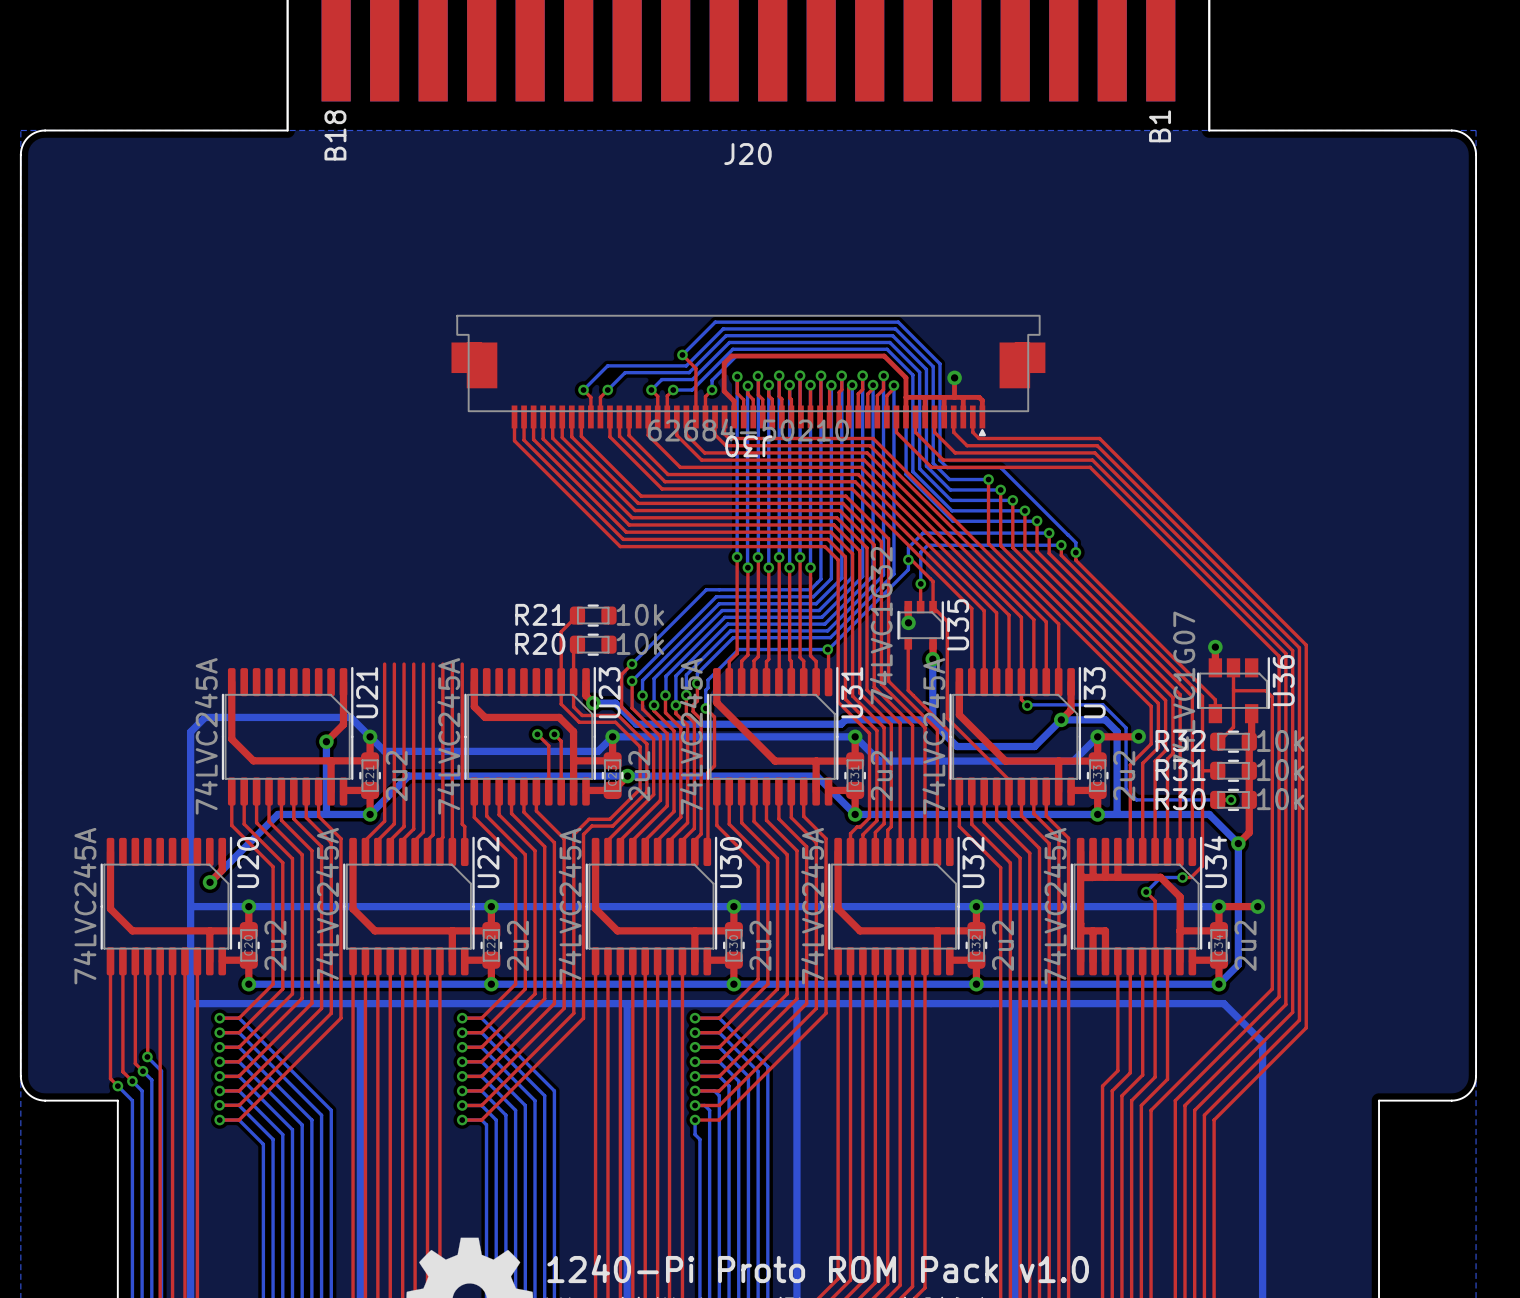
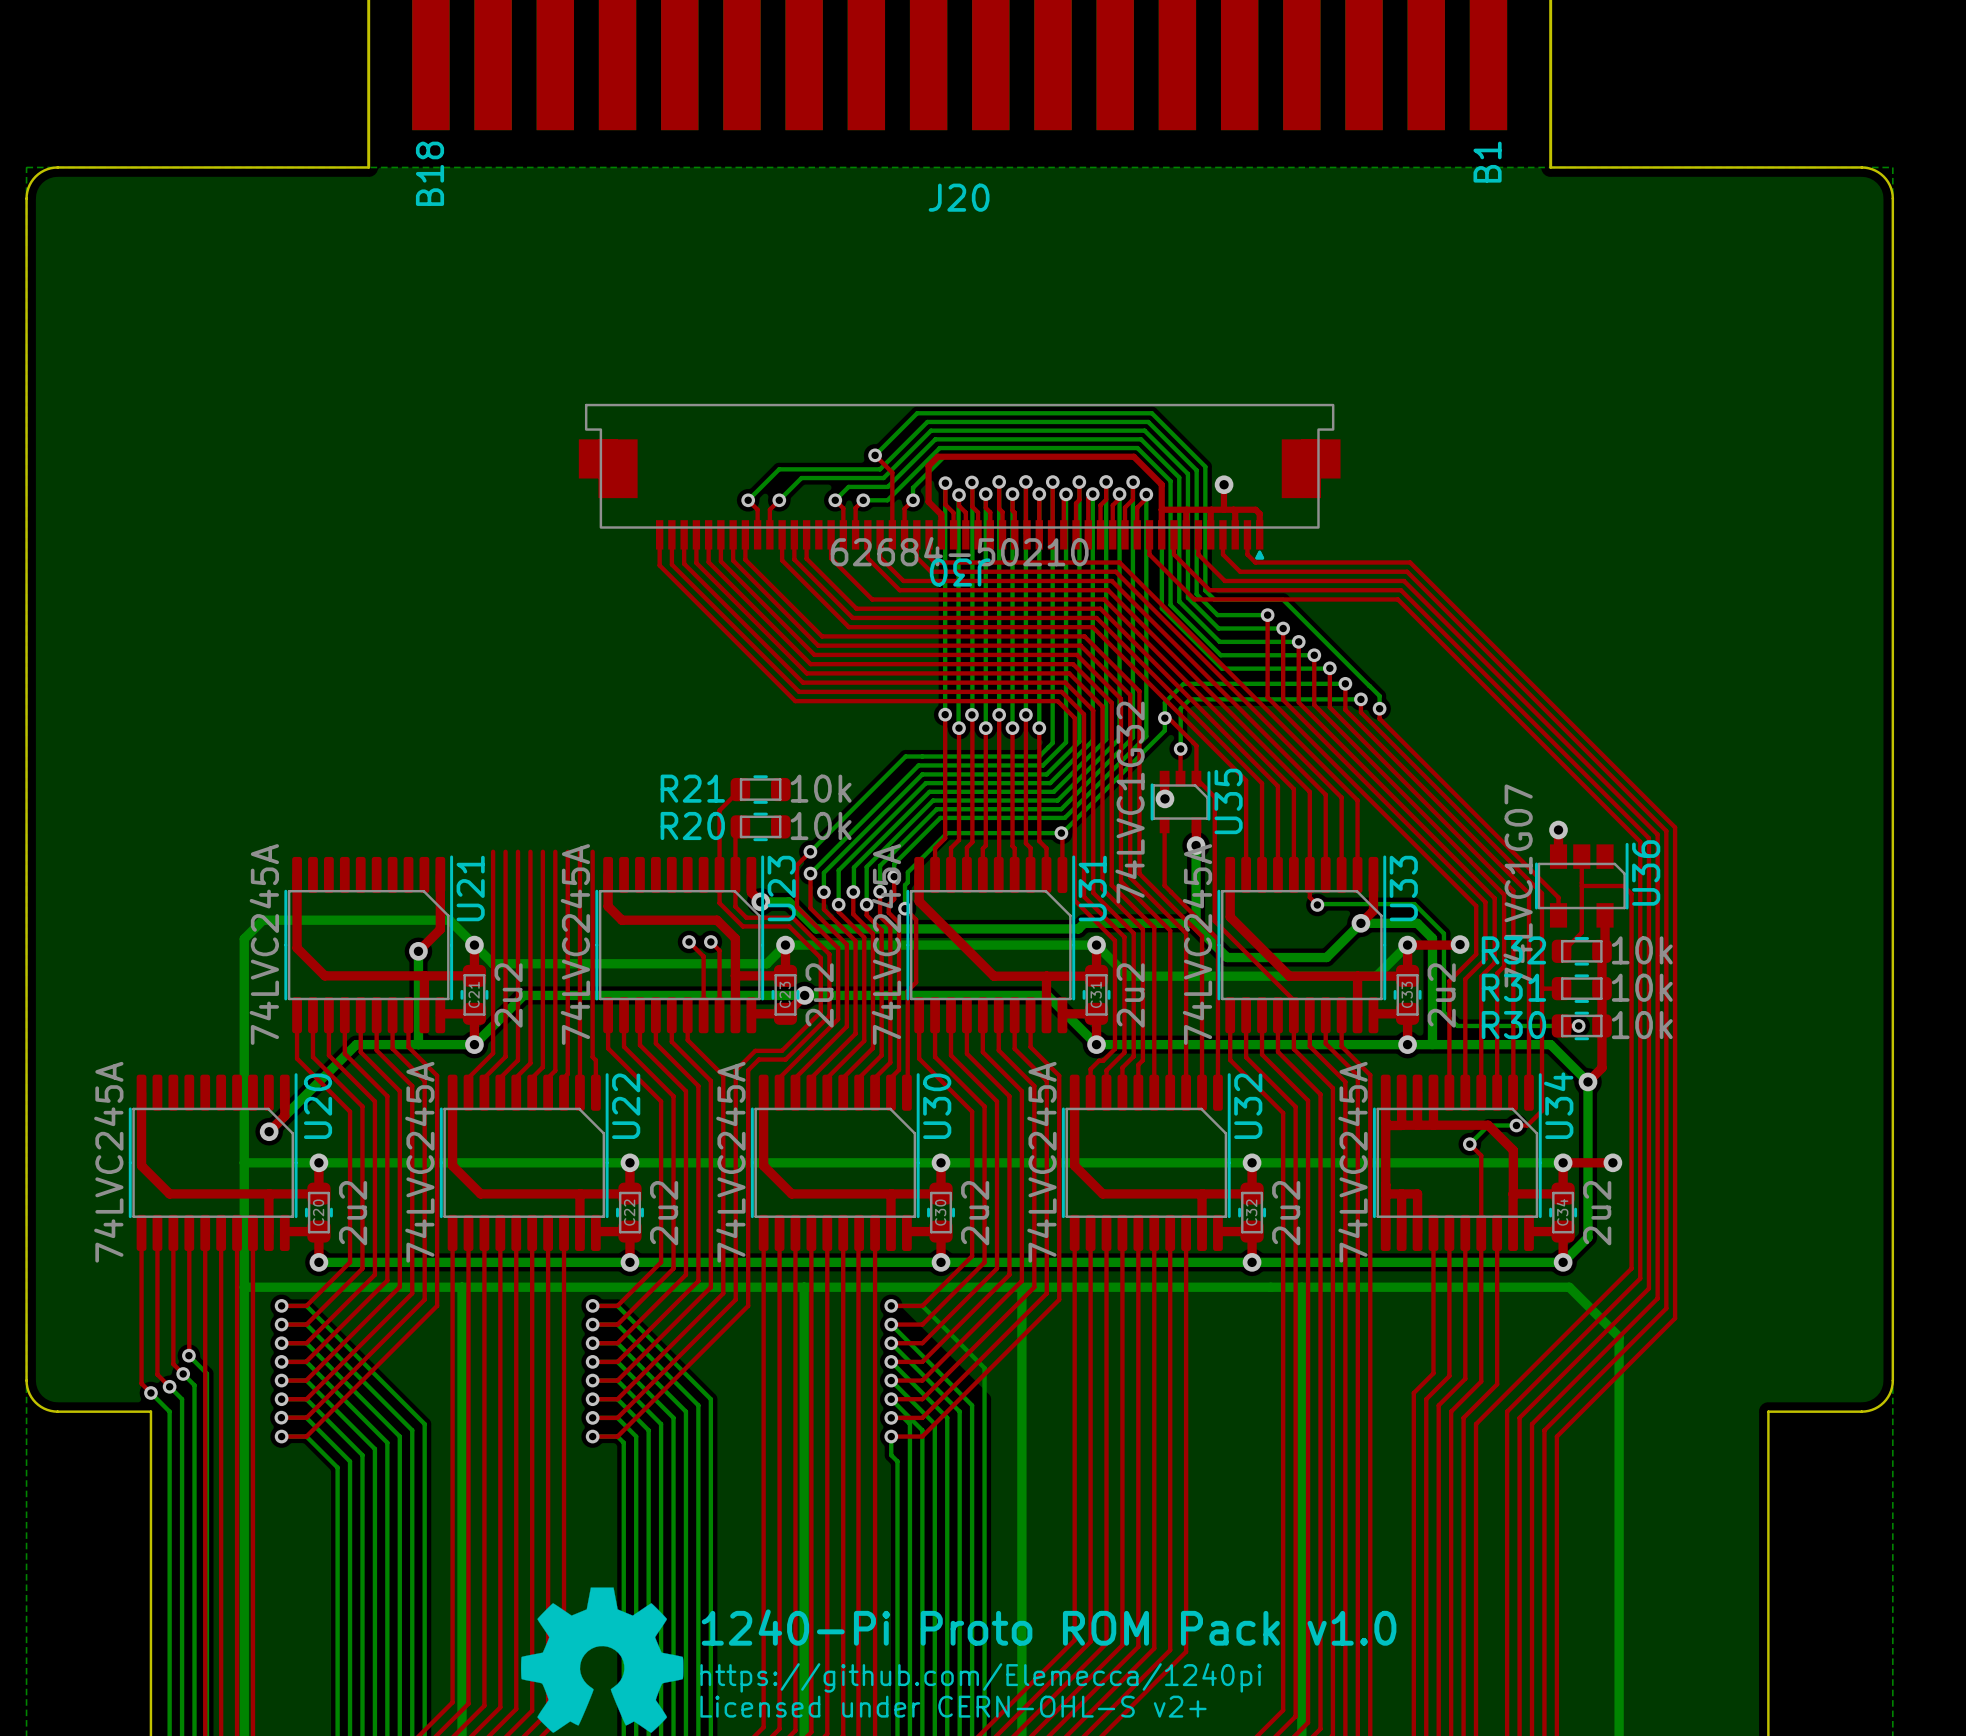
bottom track: (695, 1032) (719, 1032) (758, 1071) (758, 1095) -> (891, 1324) (972, 1405)
bottom track: (695, 1047) (719, 1047) (748, 1076) (748, 1100) -> (891, 1343) (959, 1411)
bottom track: (695, 1061) (719, 1061) (738, 1081) (738, 1105) -> (891, 1361) (947, 1417)
bottom track: (695, 1076) (719, 1076) (729, 1086) (729, 1110) -> (891, 1380) (934, 1424)
bottom track: (695, 1090) (714, 1090) (719, 1095) (719, 1115) -> (891, 1399) (922, 1430)

